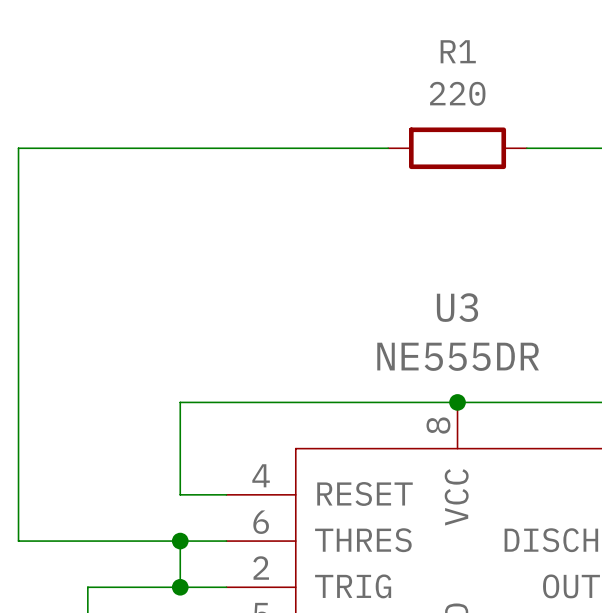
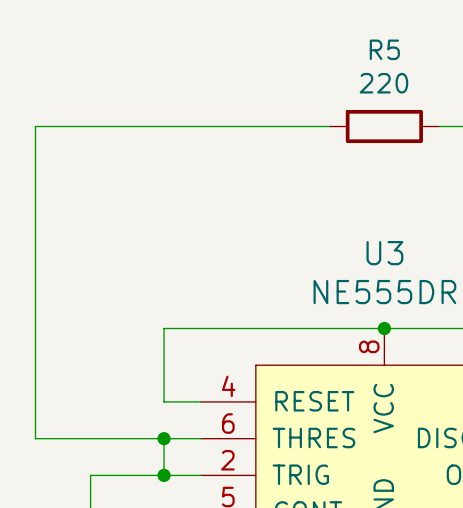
R1 name: R1 (458, 51) -> R5 (384, 49)

